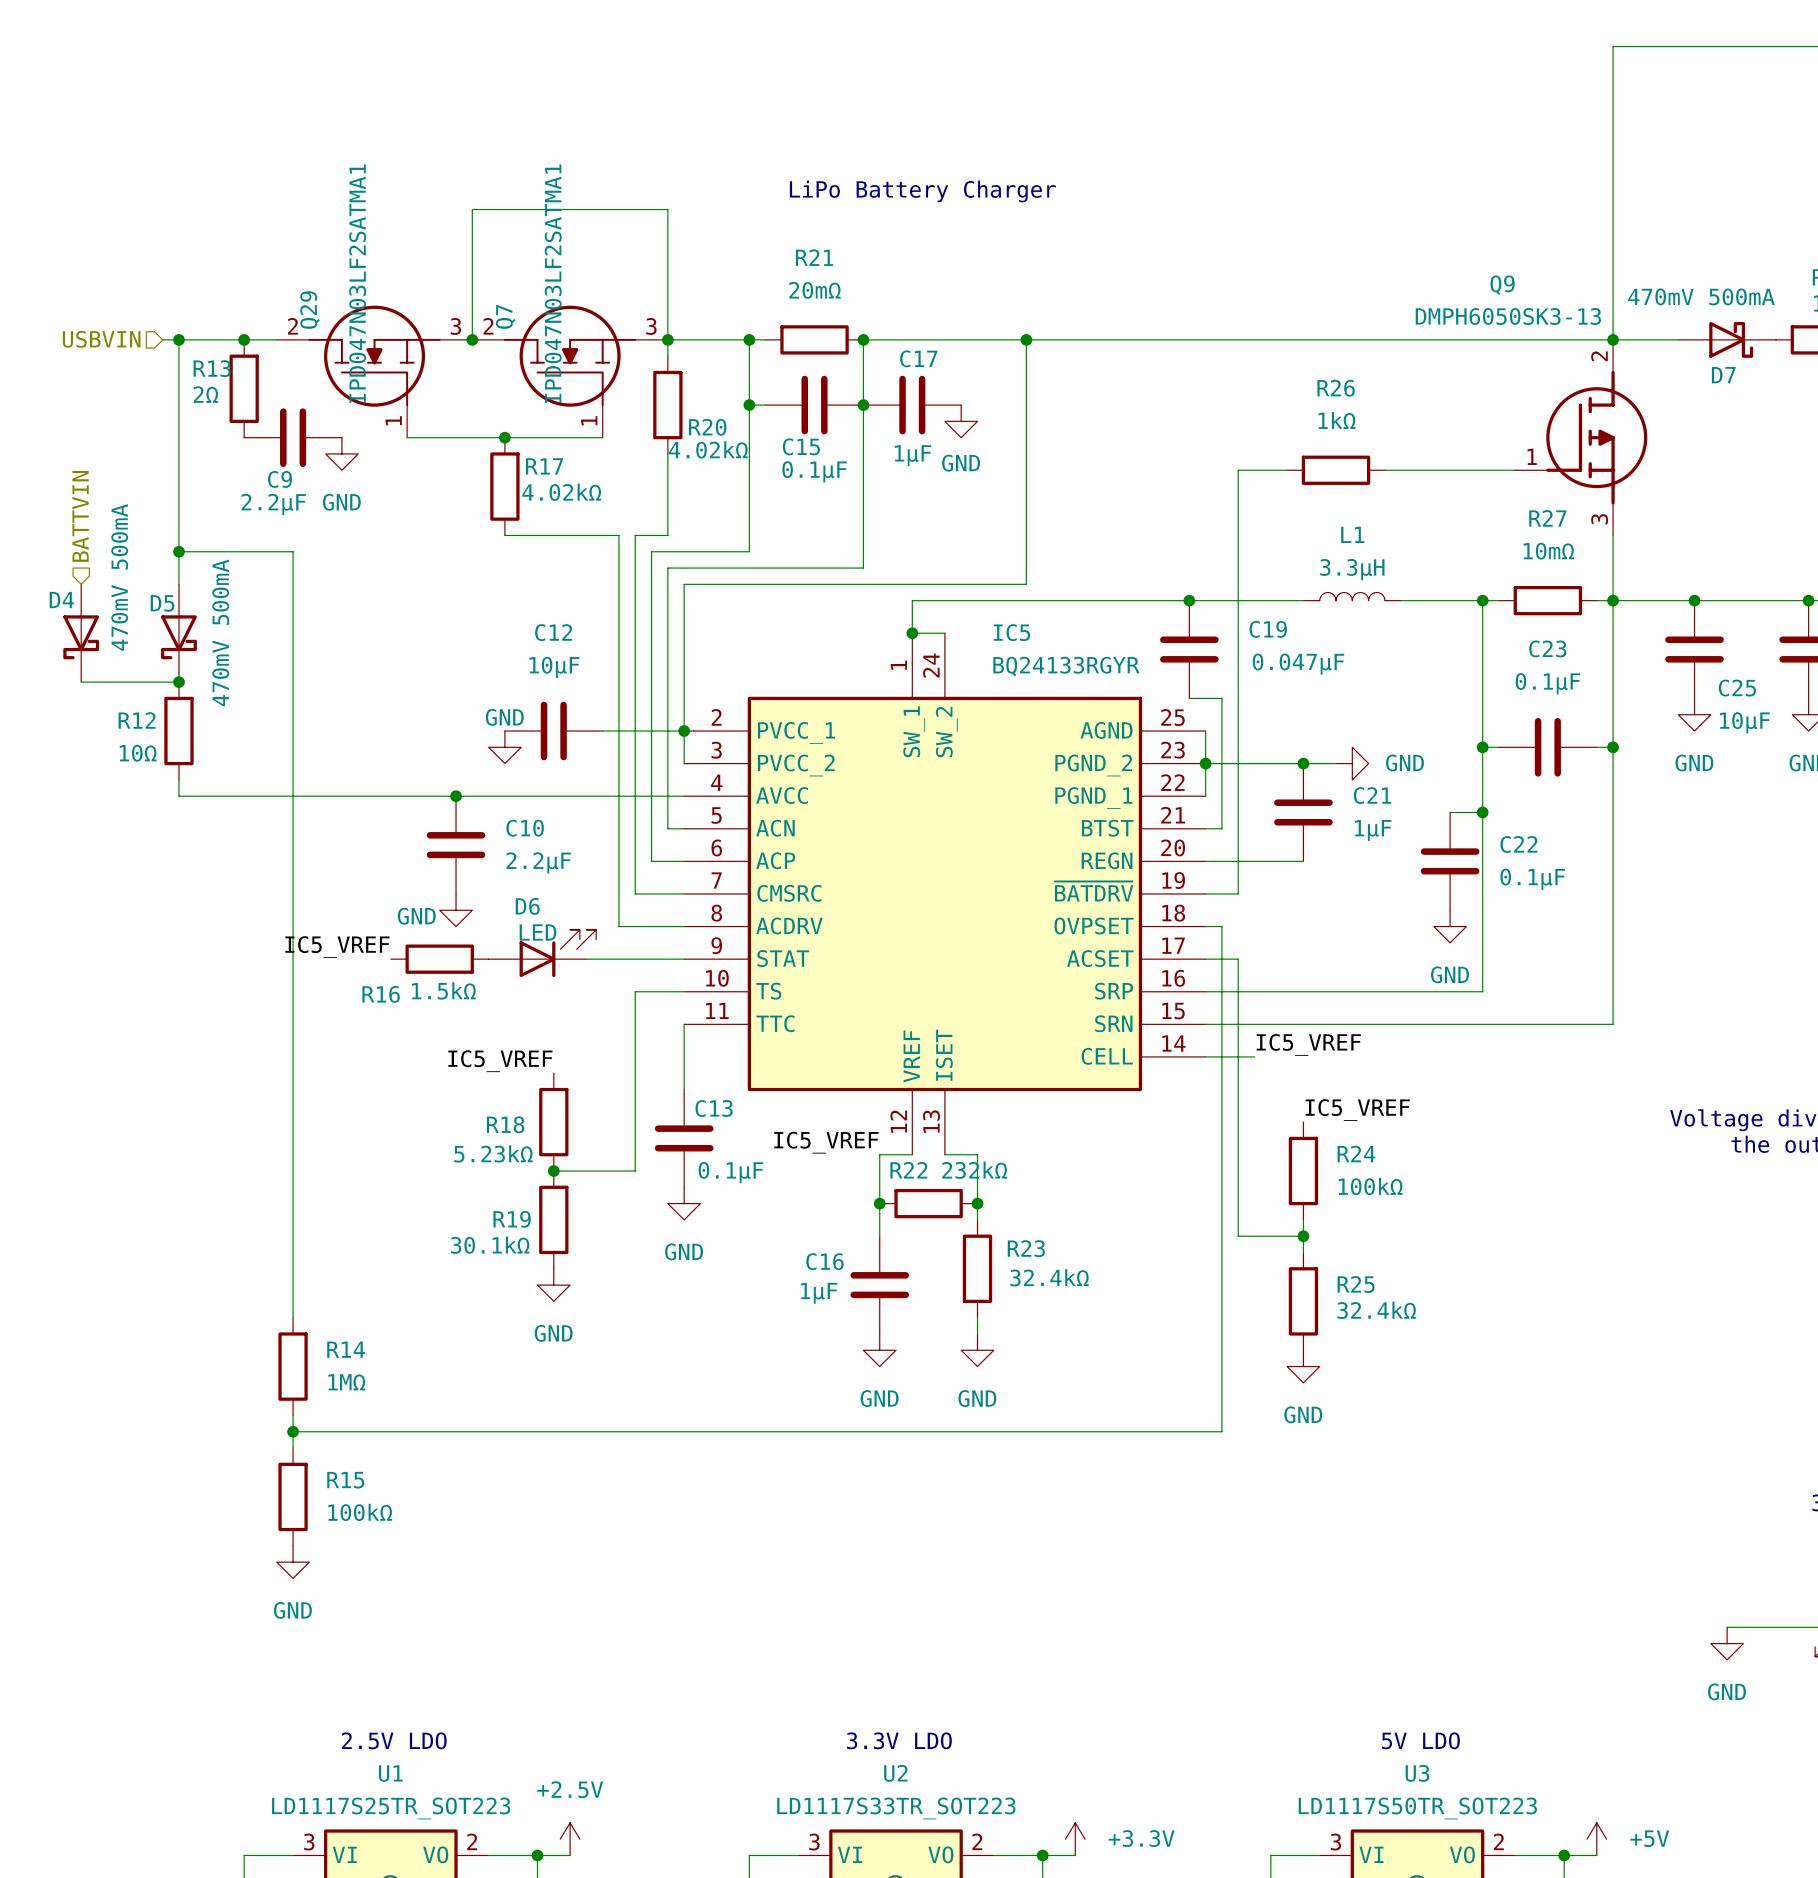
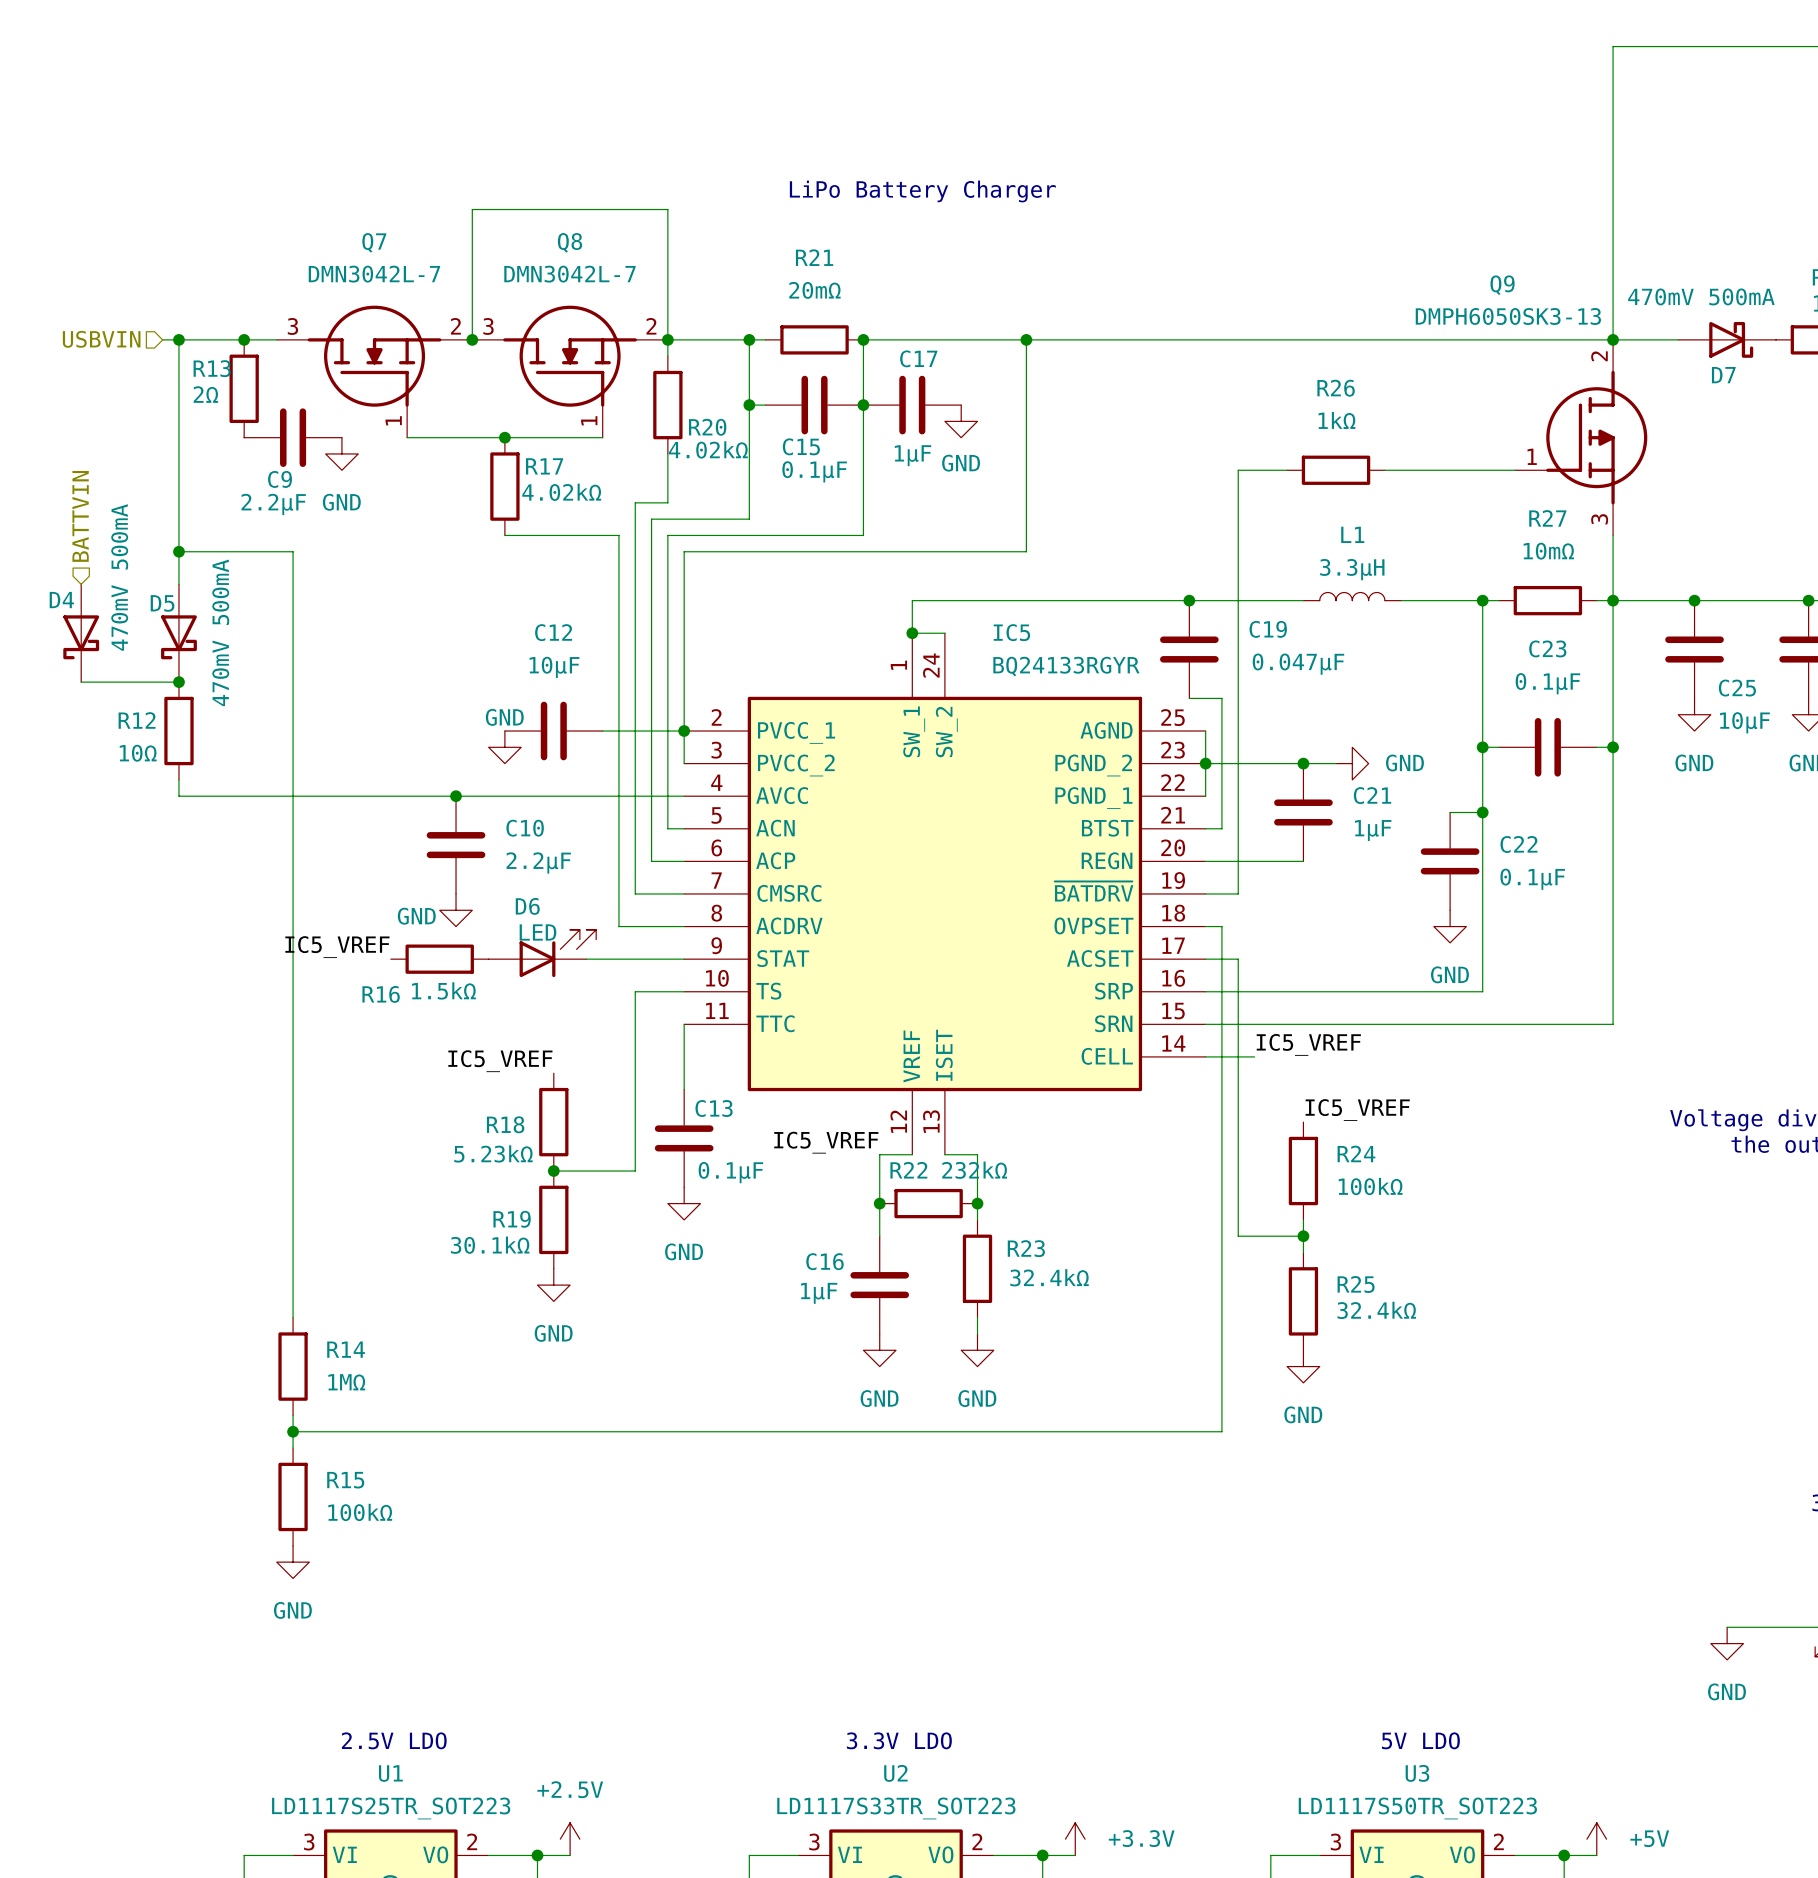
Q7 value: IPD047N03LF2SATMA1 (553, 283) -> DMN3042L-7 (374, 274)
Q7 symbol: [472, 305, 668, 438] -> [276, 305, 473, 438]
Q7 name position: Q7 (505, 316) -> Q7 (374, 242)
Q29: IPD047N03LF2SATMA1 (374, 371) -> none
Q8: none -> DMN3042L-7 (570, 371)
wire: (667, 502) (667, 535) (635, 535) -> (667, 502) (635, 502) (635, 535)
wire: (749, 519) (749, 551) -> (749, 519) (651, 519) (651, 551)
wire: (863, 535) (863, 568) (667, 568) -> (863, 535) (667, 535) (667, 568)
wire: (651, 551) (684, 551) -> (684, 584) (684, 551)
wire: (1026, 551) (1026, 584) (684, 584) -> (1026, 551) (749, 551)

